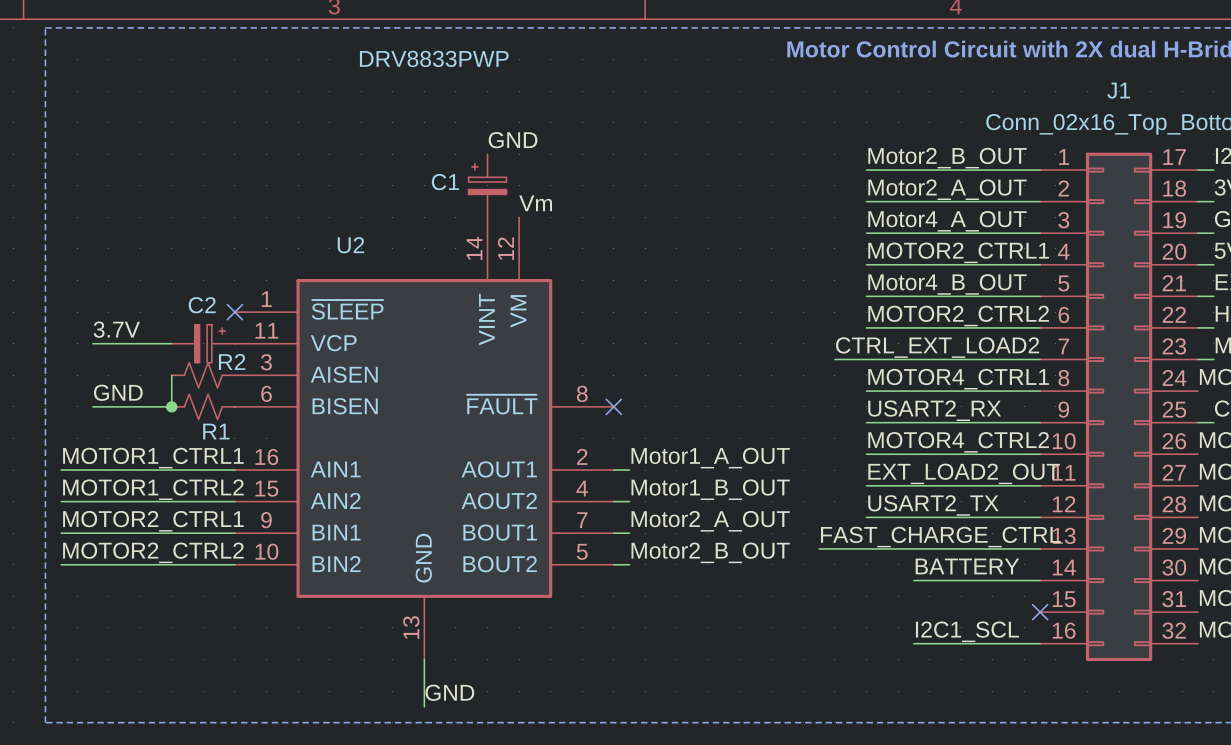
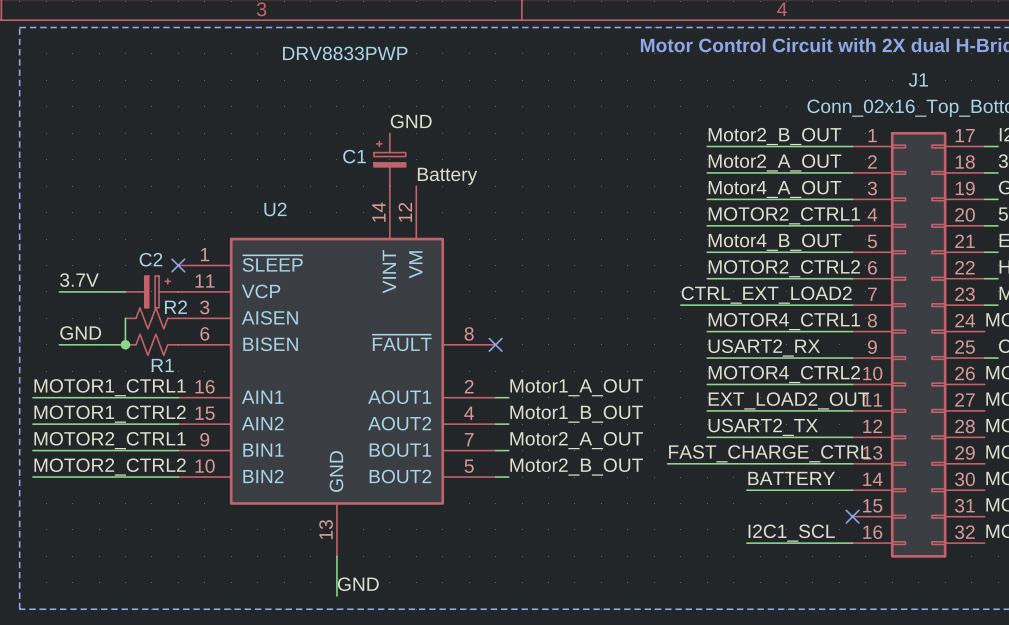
label: Vm (535, 203) -> Battery (447, 176)

